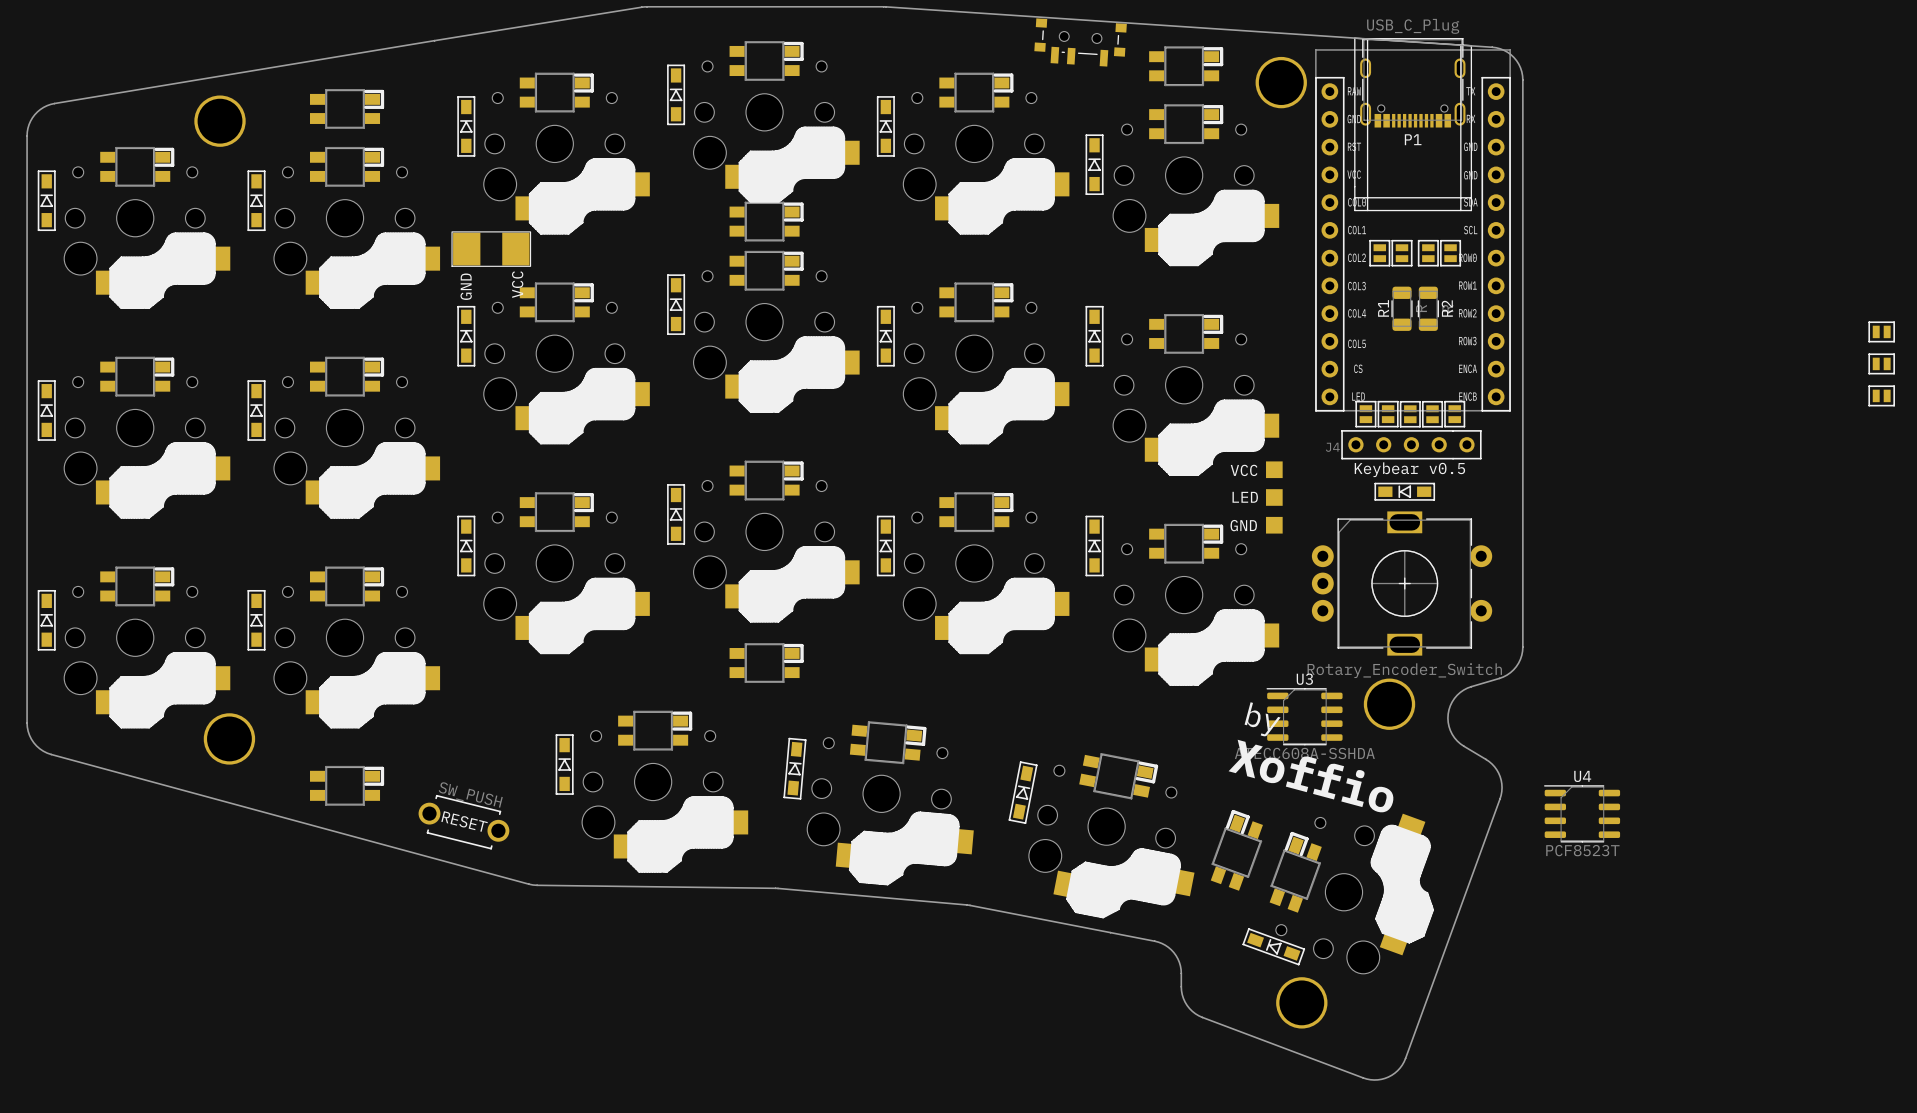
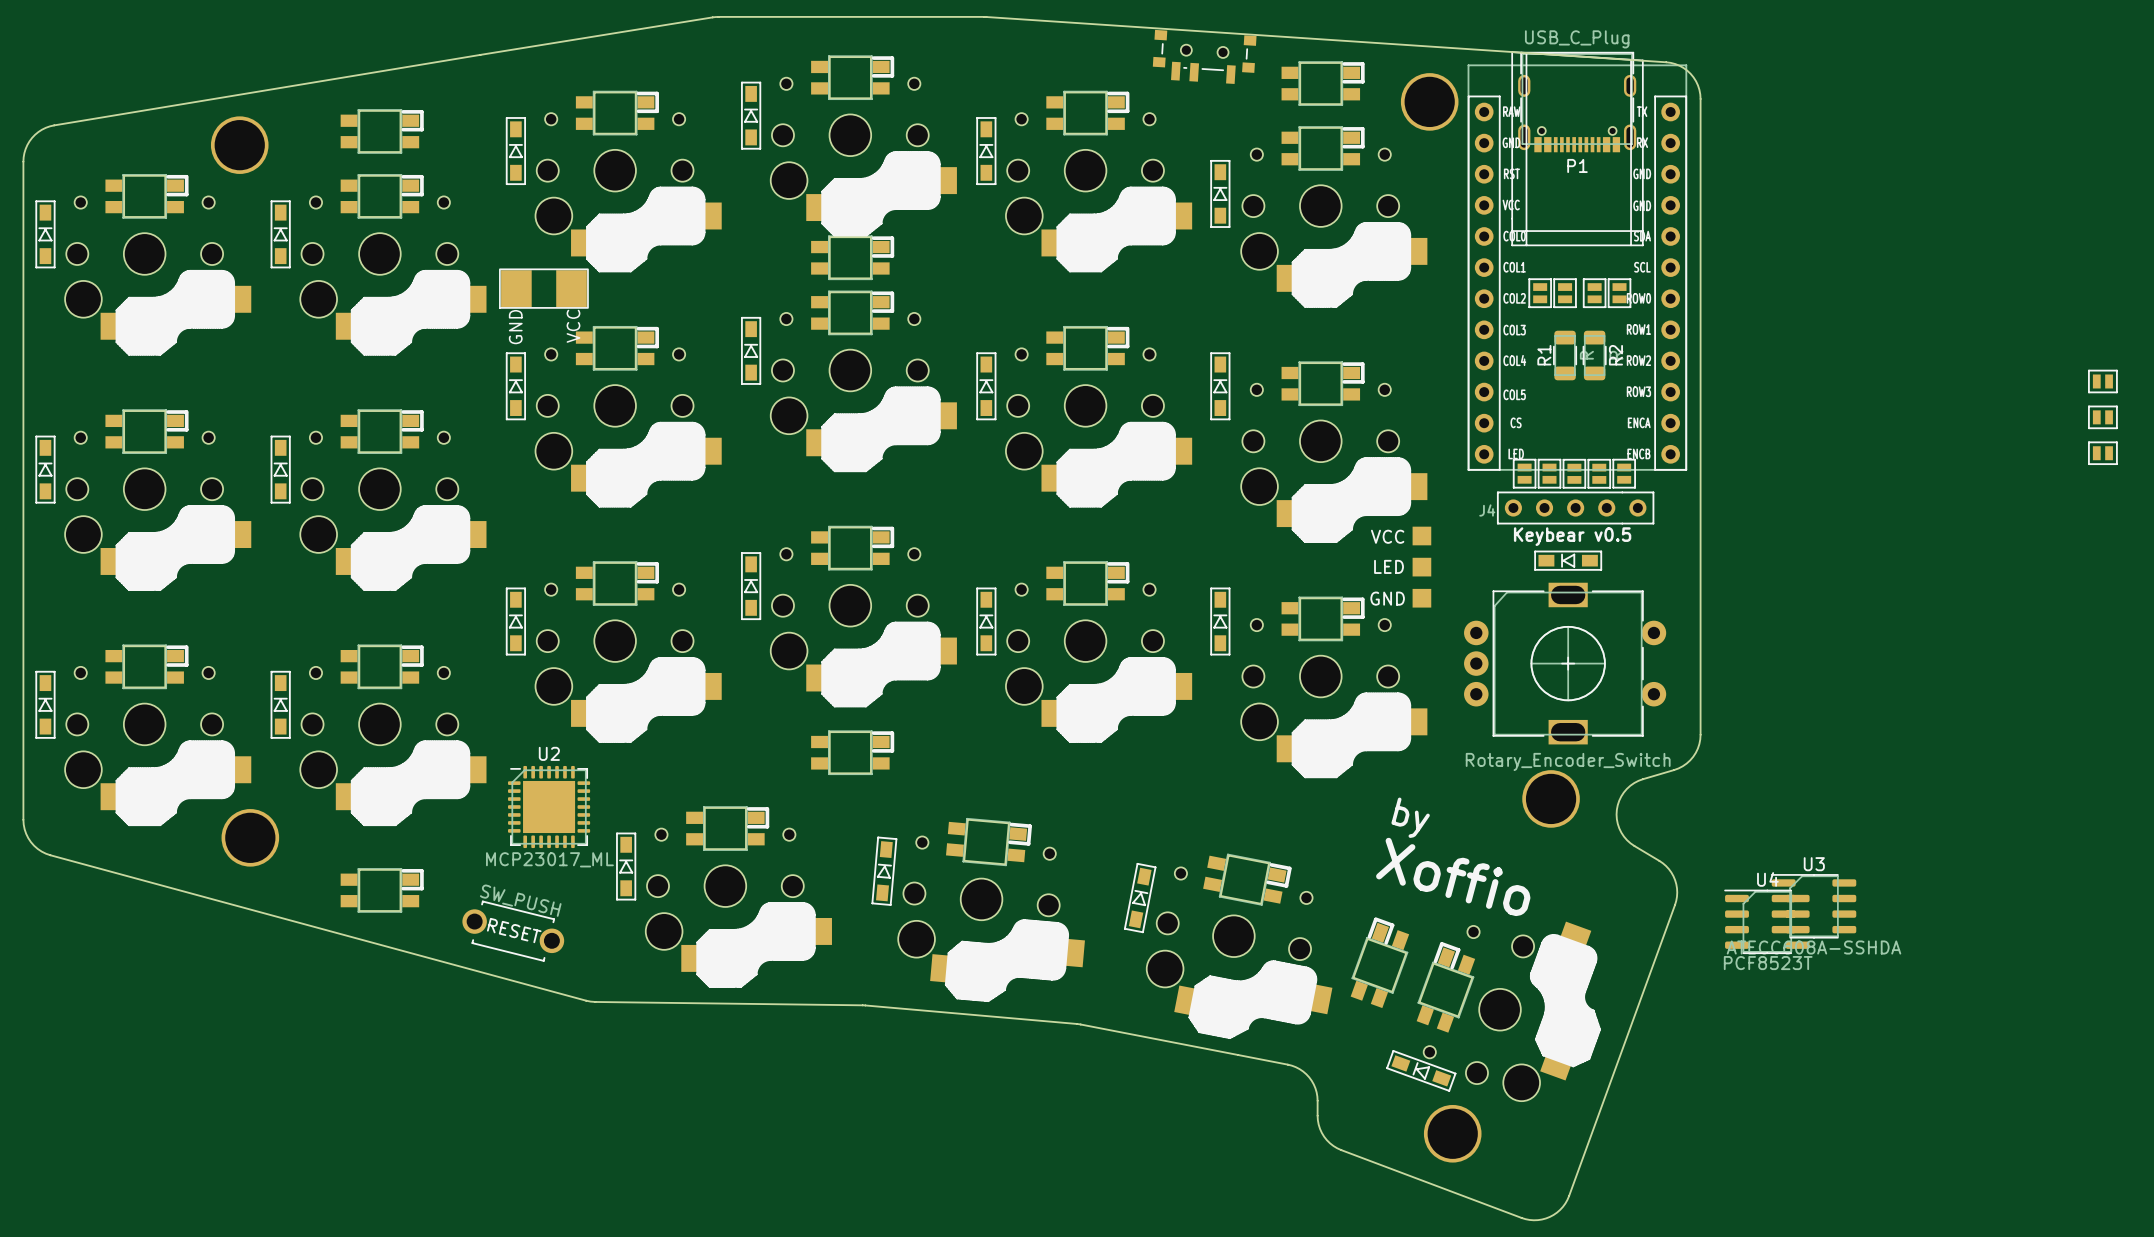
U2: none -> MCP23017_ML (549, 807)
U3 position: (1304, 716) -> (1813, 906)

